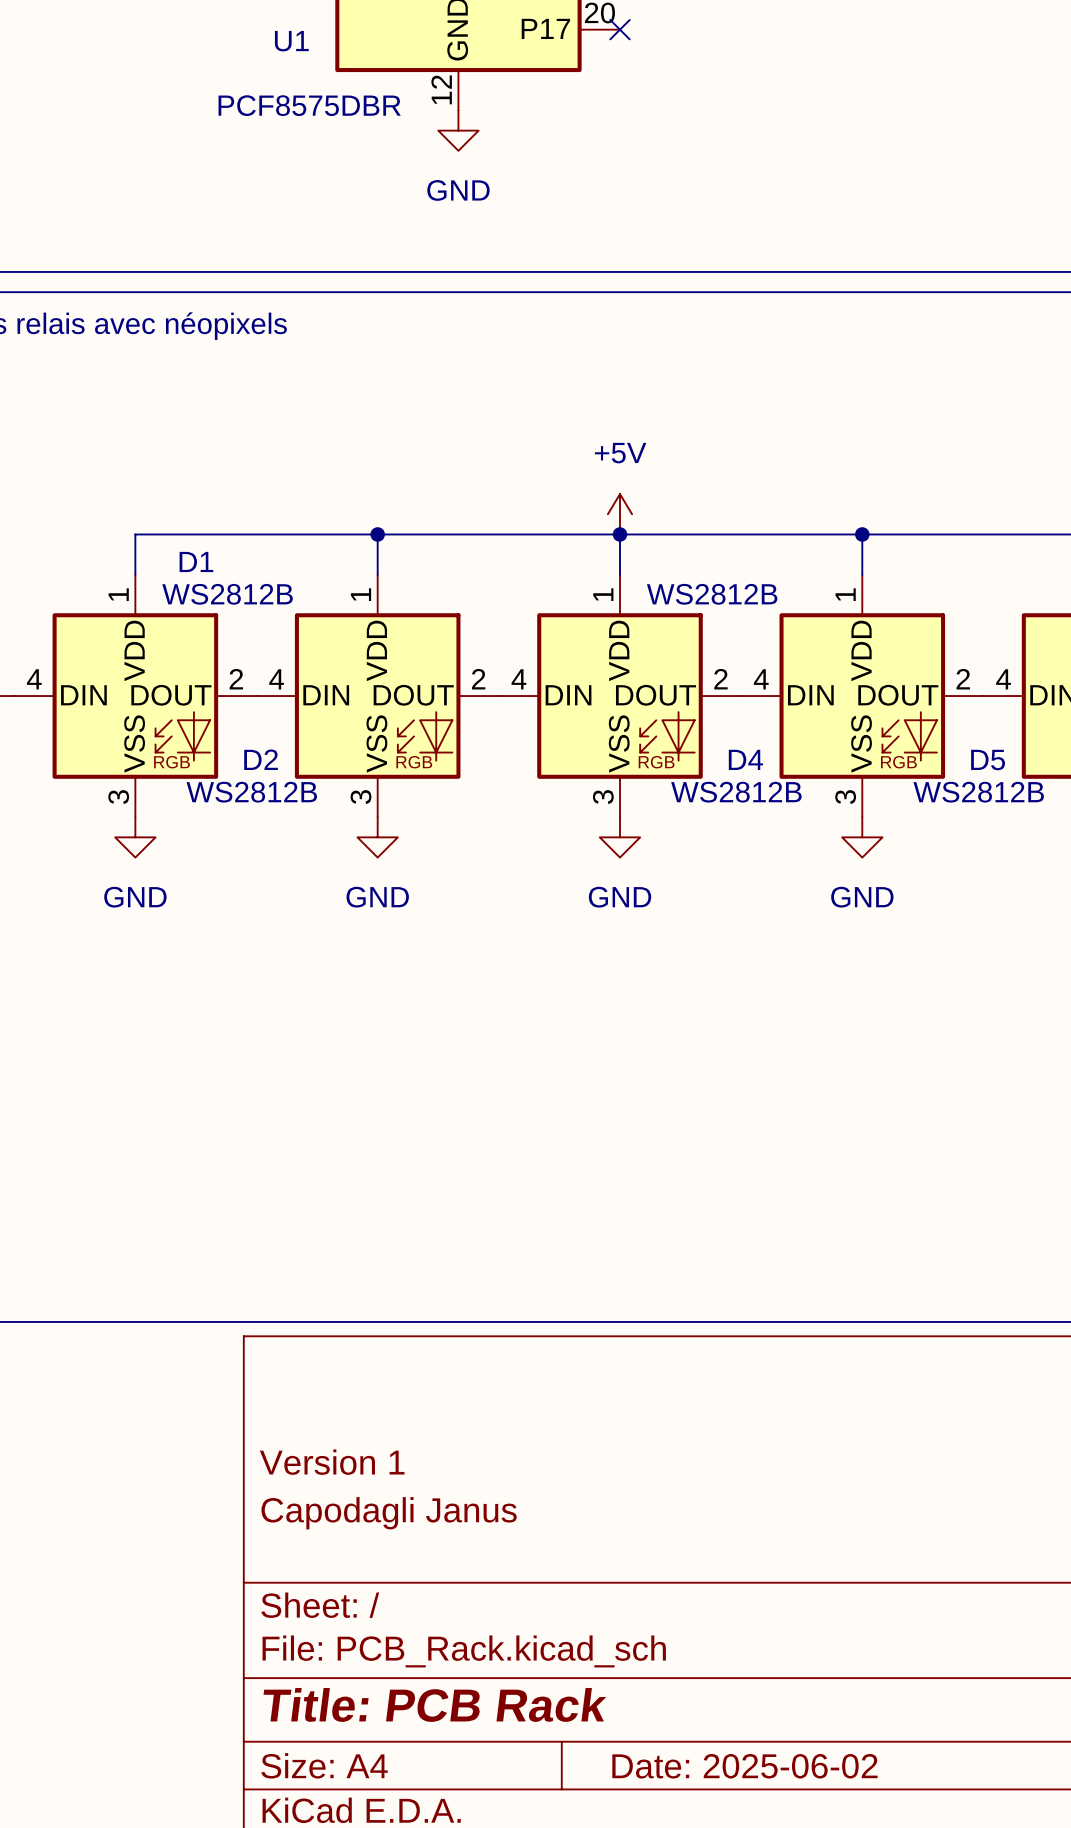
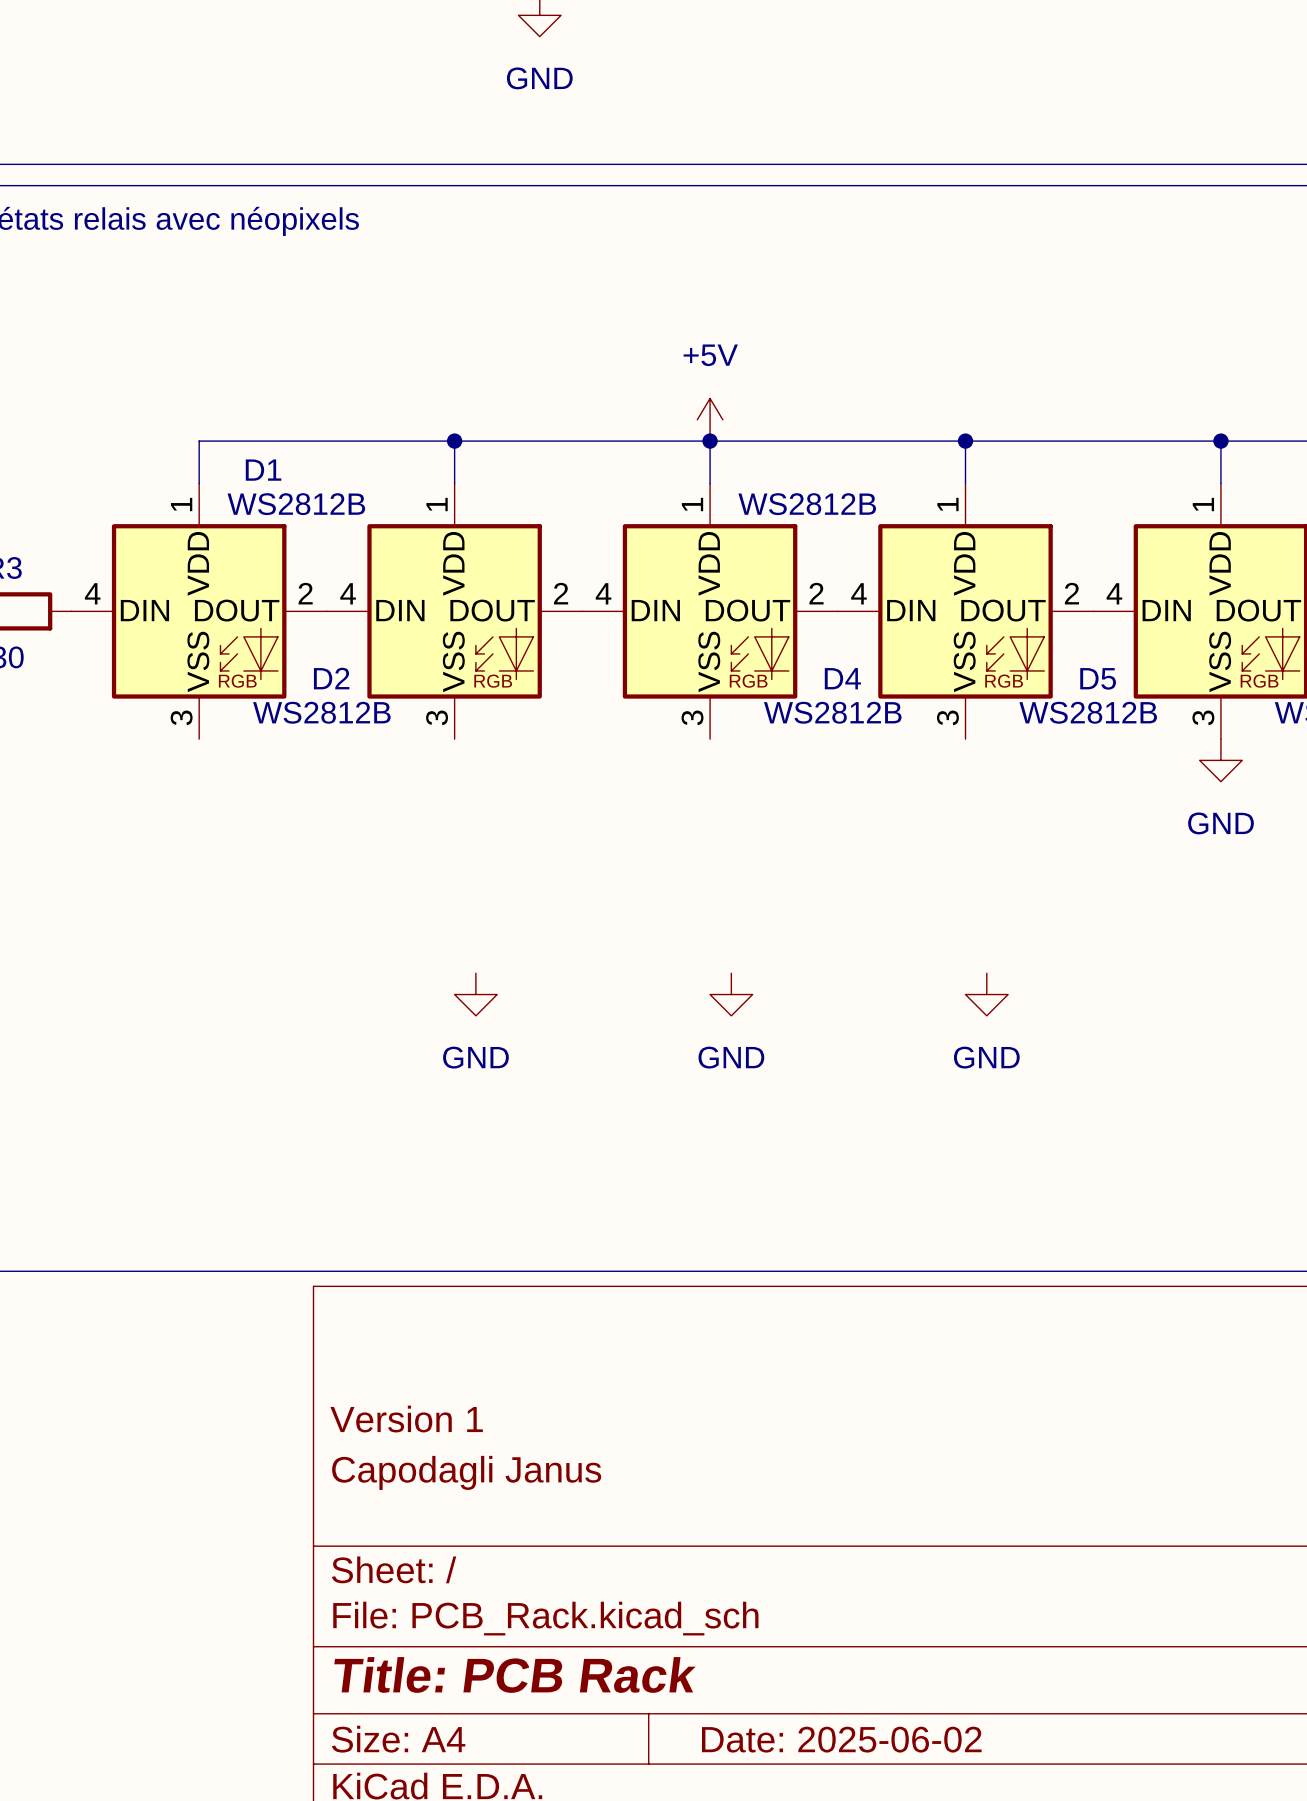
power symbol: GND (135, 837) -> none
power symbol: GND (377, 837) -> none
power symbol: GND (619, 837) -> none
power symbol: GND (862, 837) -> none
power symbol: none -> GND (475, 994)
power symbol: none -> GND (731, 994)
power symbol: none -> GND (986, 994)

